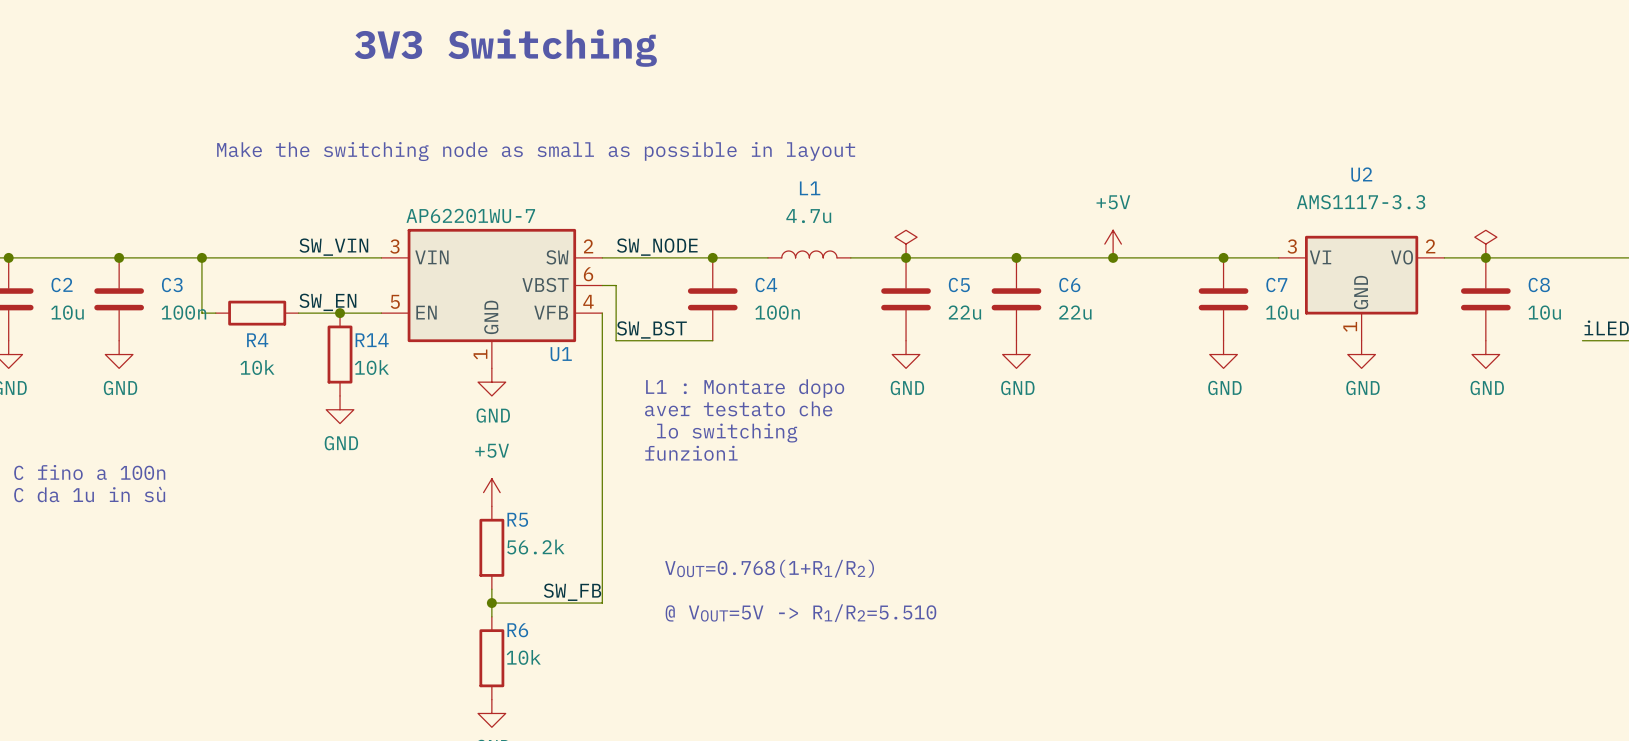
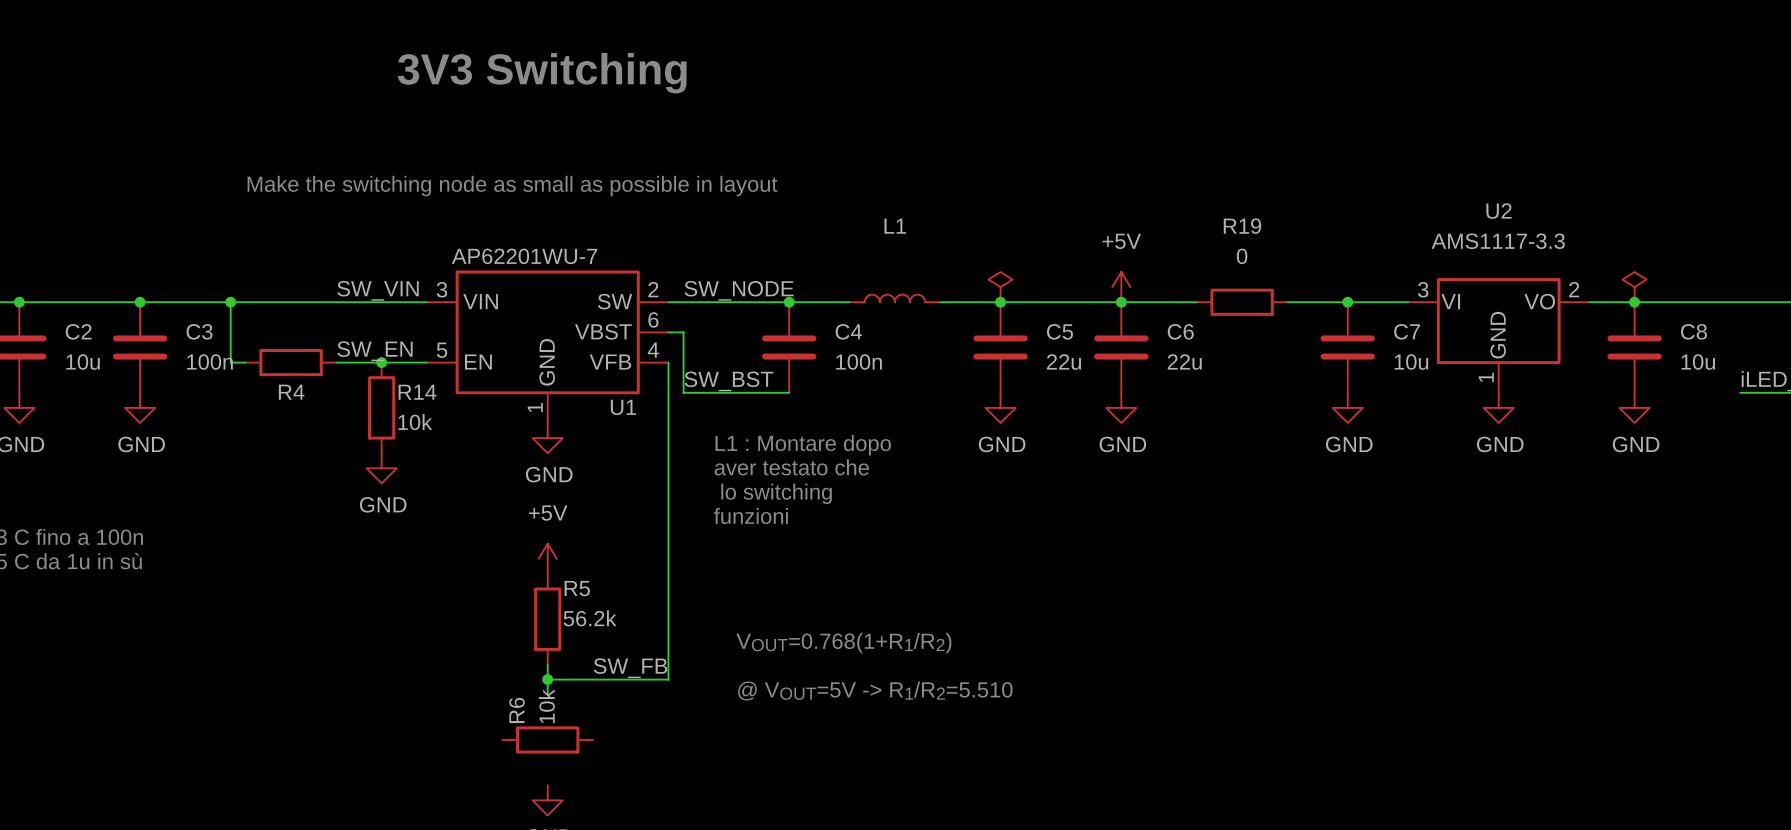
L1 value: 4.7u (808, 216) -> none
power symbol position: +5V (1113, 244) -> +5V (1121, 287)
wire: (1085, 257) (1168, 257) -> none
junction: (1113, 257) -> none
R19: none -> 0 (1242, 302)
R4 value: 10k (257, 367) -> none
R6 name position: R6 (517, 630) -> R6 (516, 710)
R6 value position: 10k (523, 657) -> 10k (546, 706)
R6 rotation: 0° (491, 658) -> 90° clockwise (547, 739)

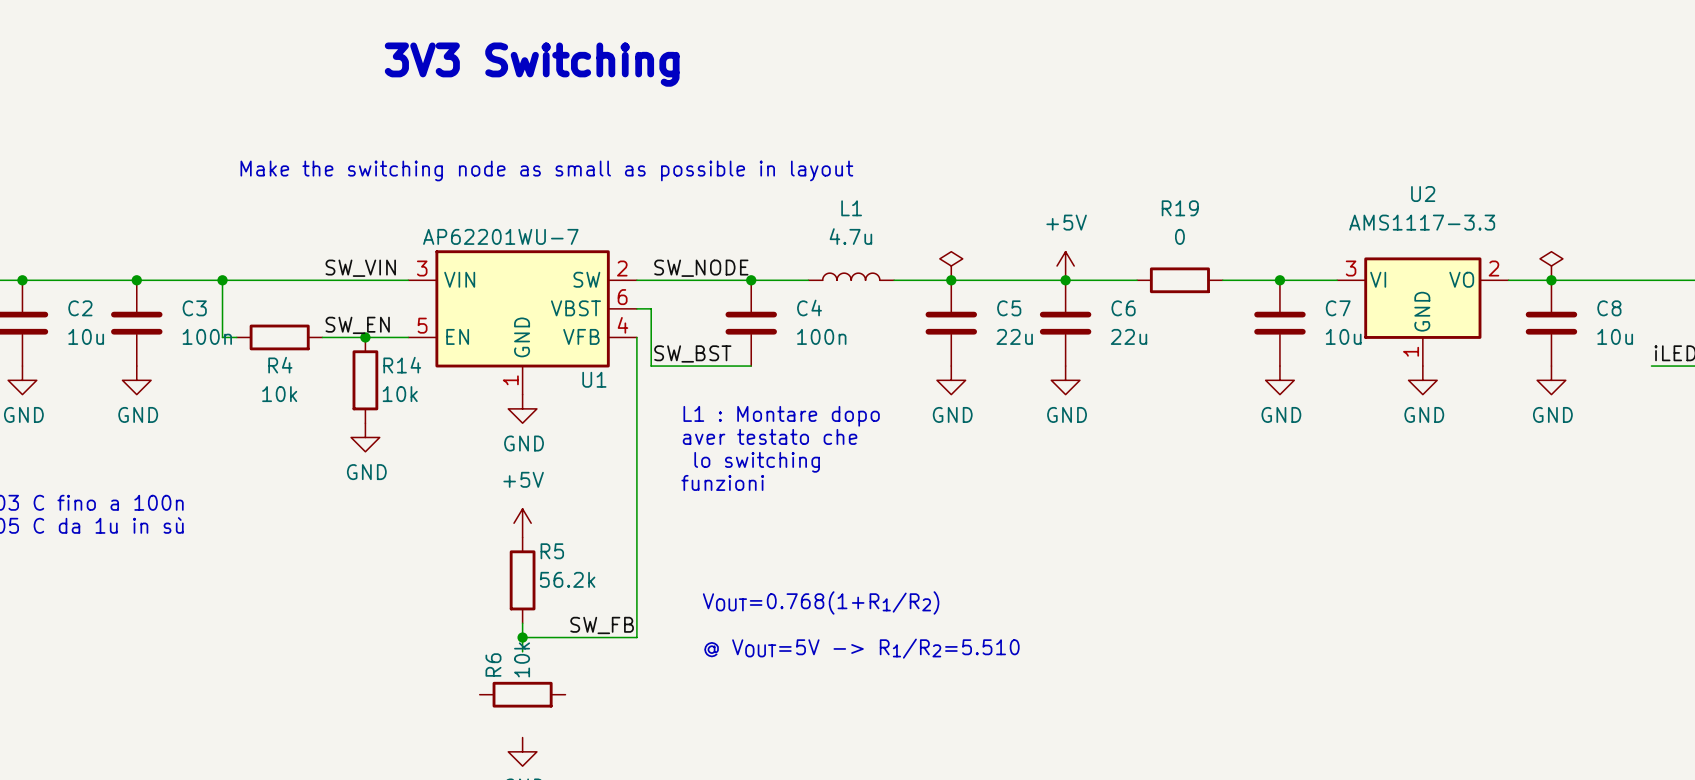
L1 value: none -> 4.7u (850, 236)
R4 value: none -> 10k (279, 394)

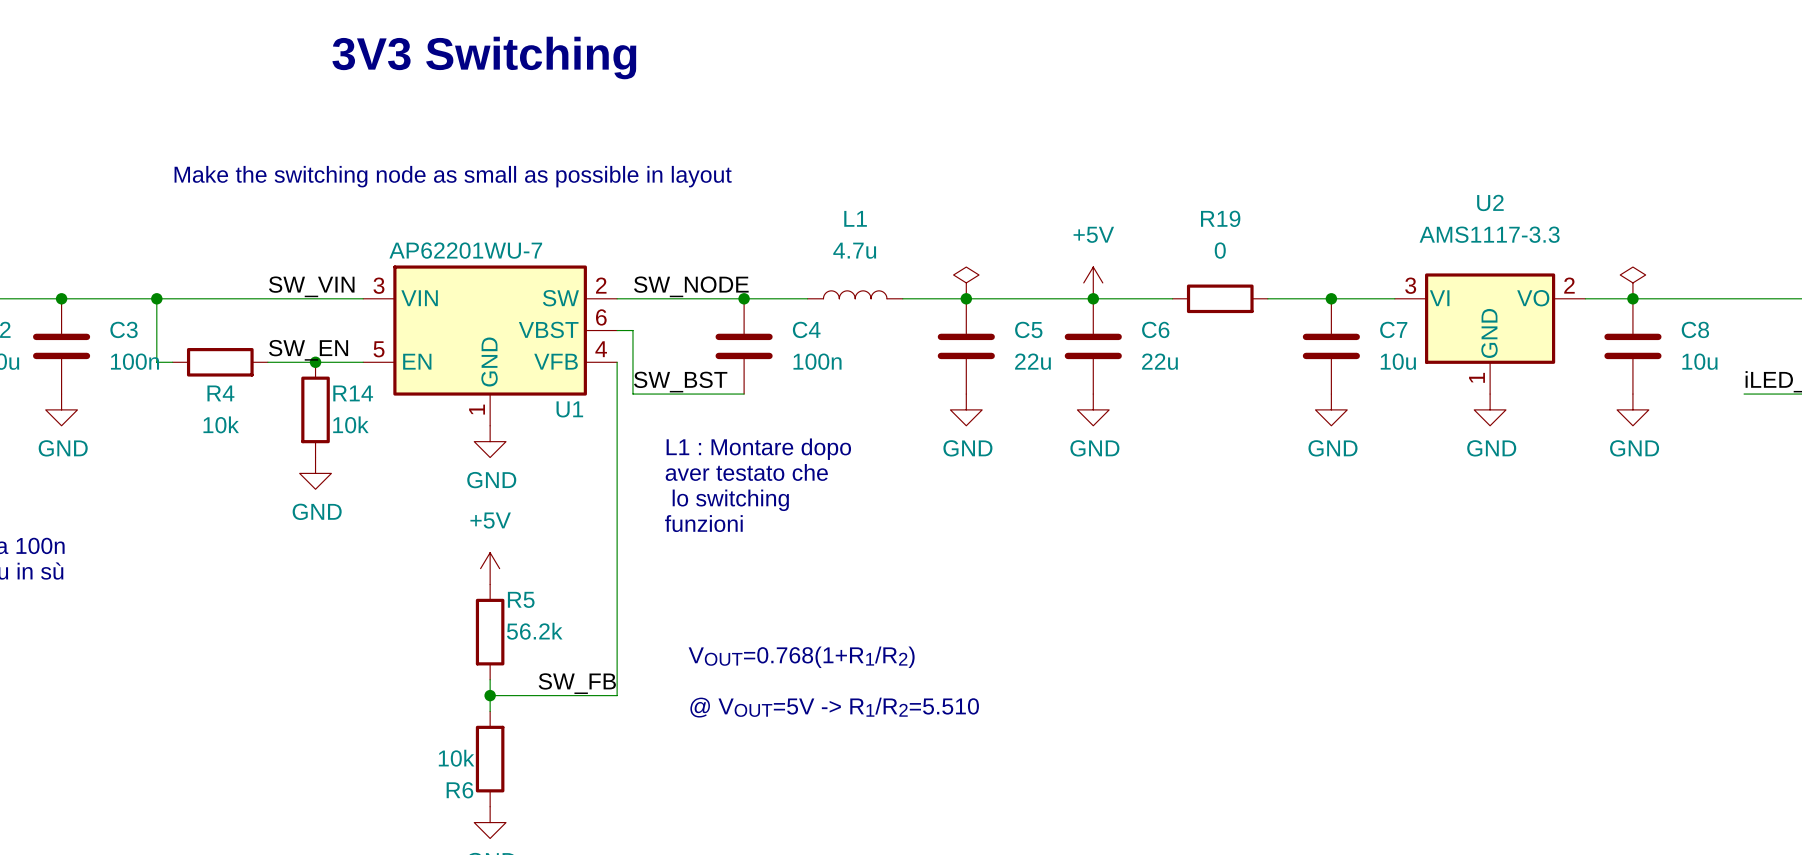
R6 value position: 10k (522, 659) -> 10k (456, 758)
R6 name position: R6 (493, 664) -> R6 (459, 790)
R6 rotation: 0° (522, 694) -> 90° clockwise (490, 759)

